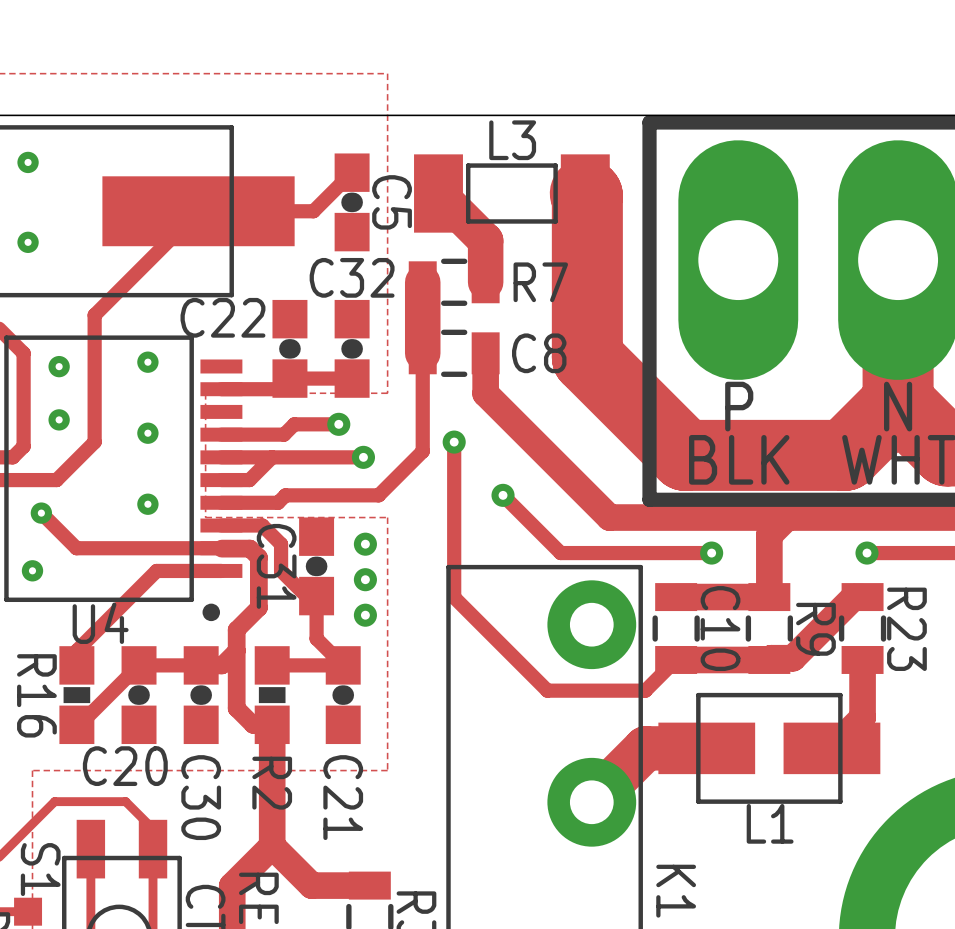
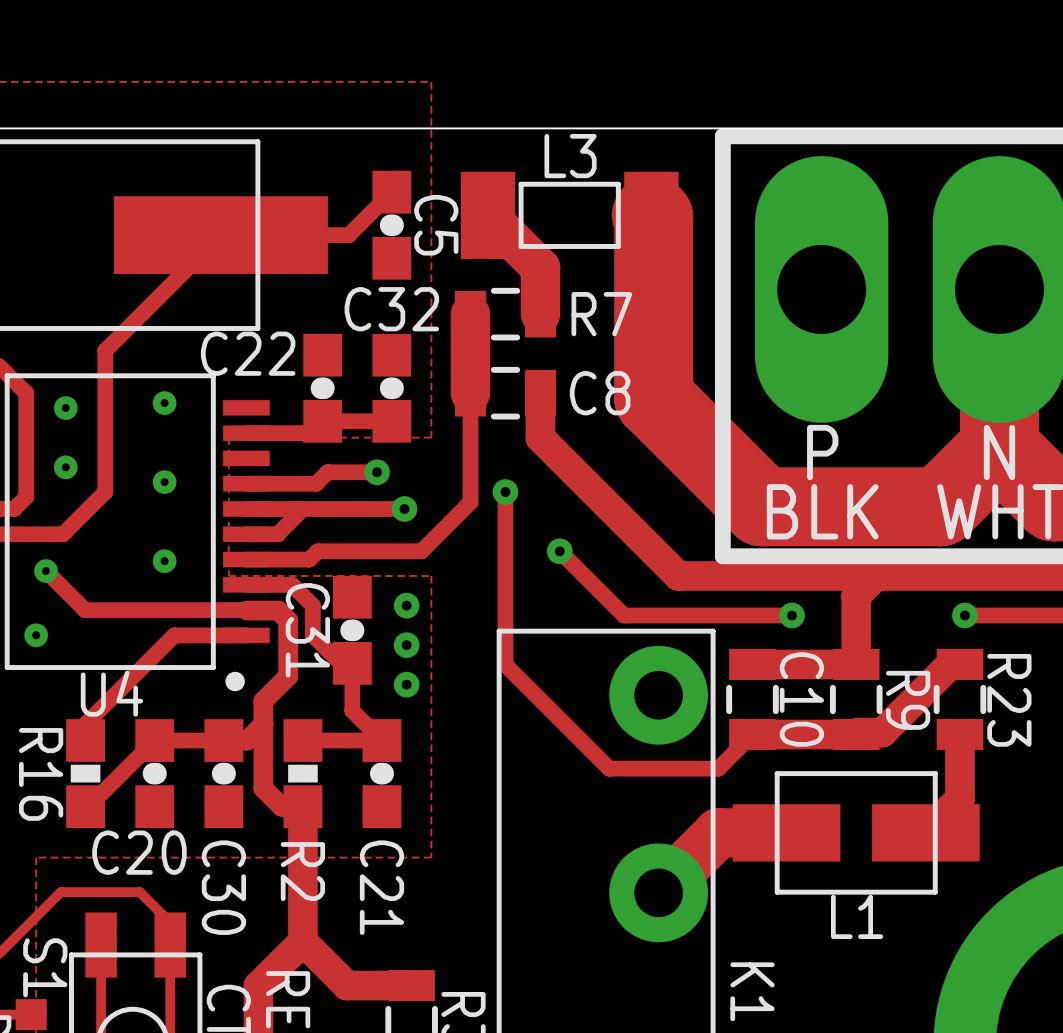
via: (28, 162) -> none
via: (28, 242) -> none

